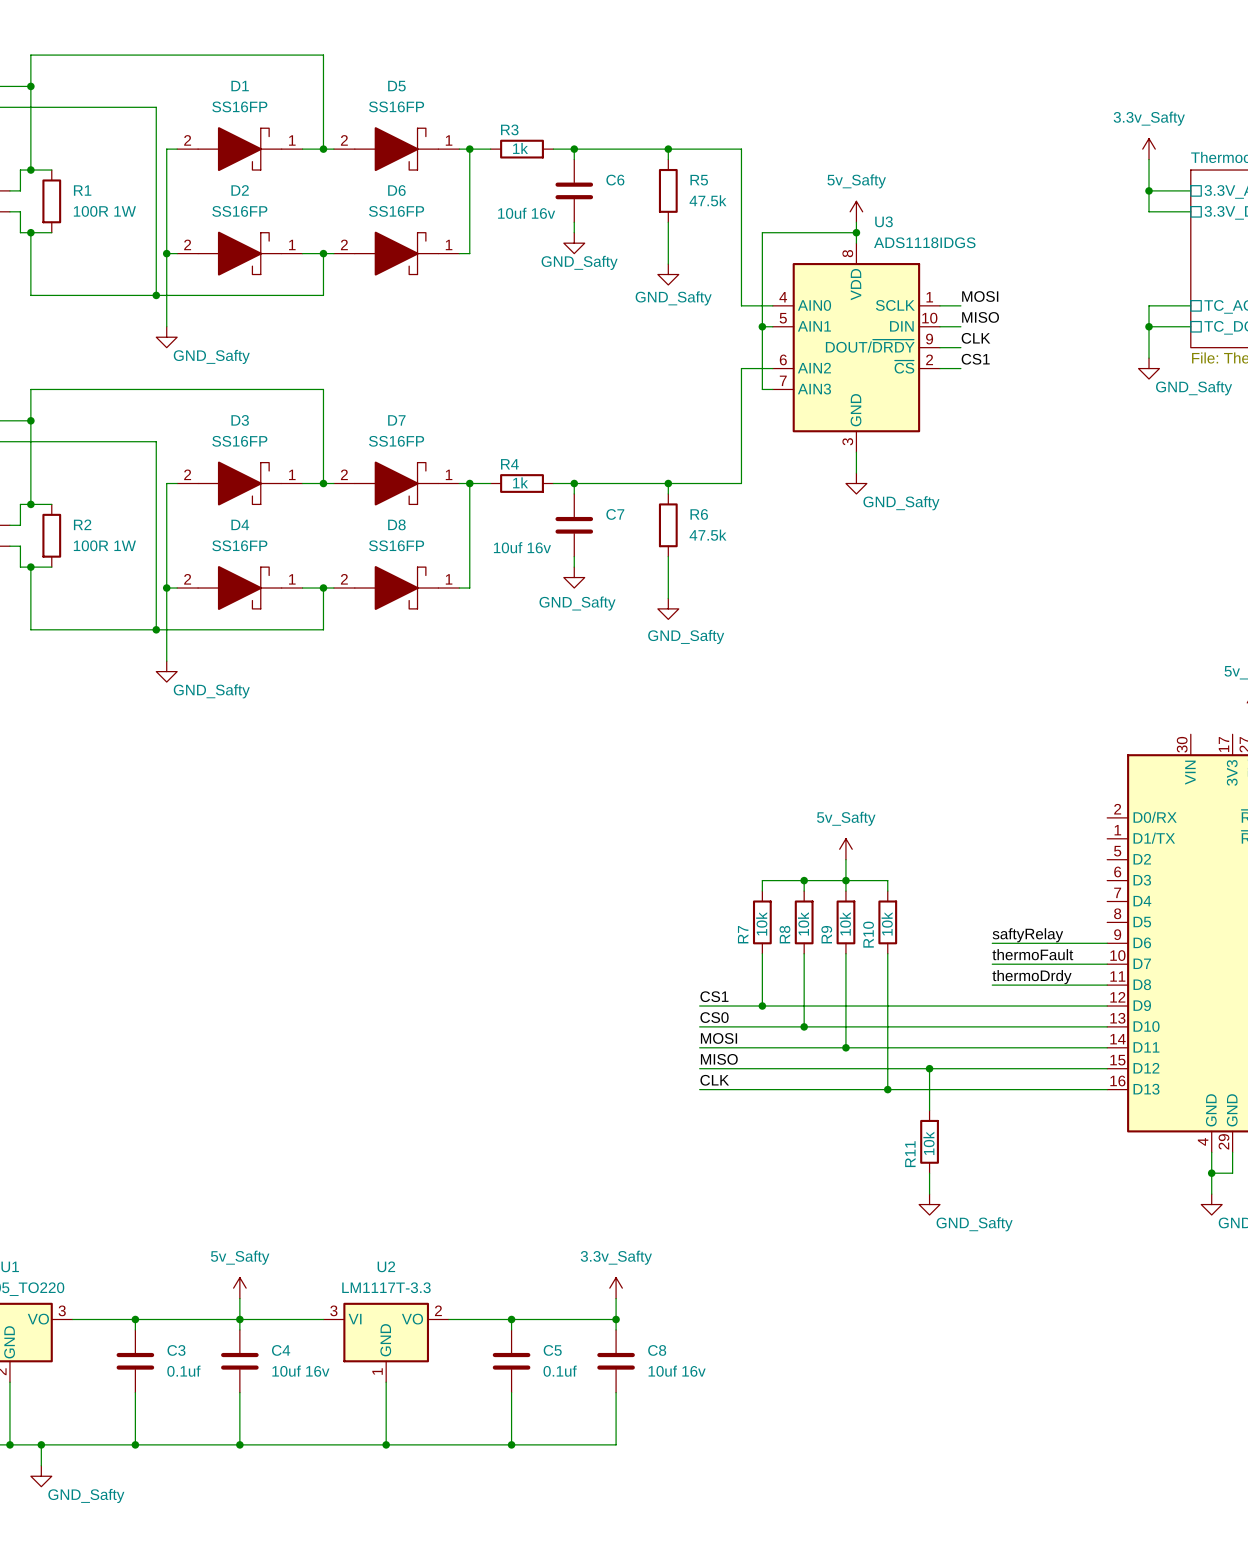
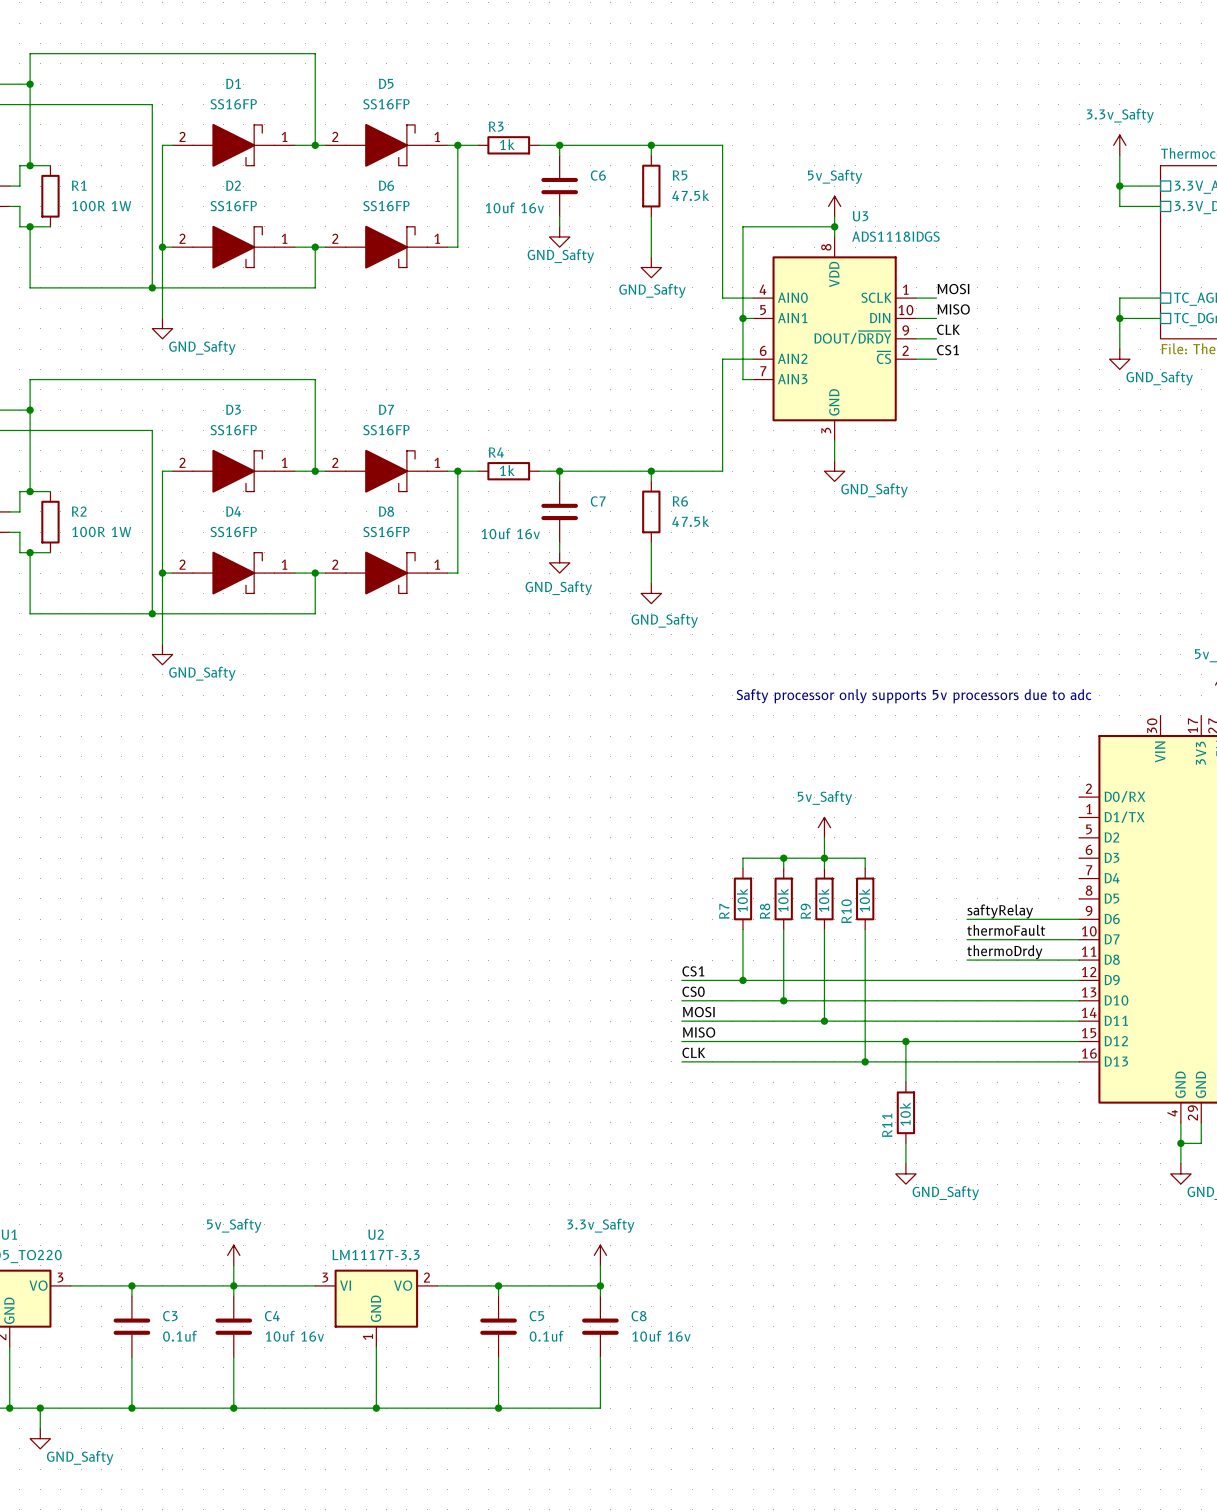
text: none -> Safty processor only supports 5v processors due to adc (914, 696)

